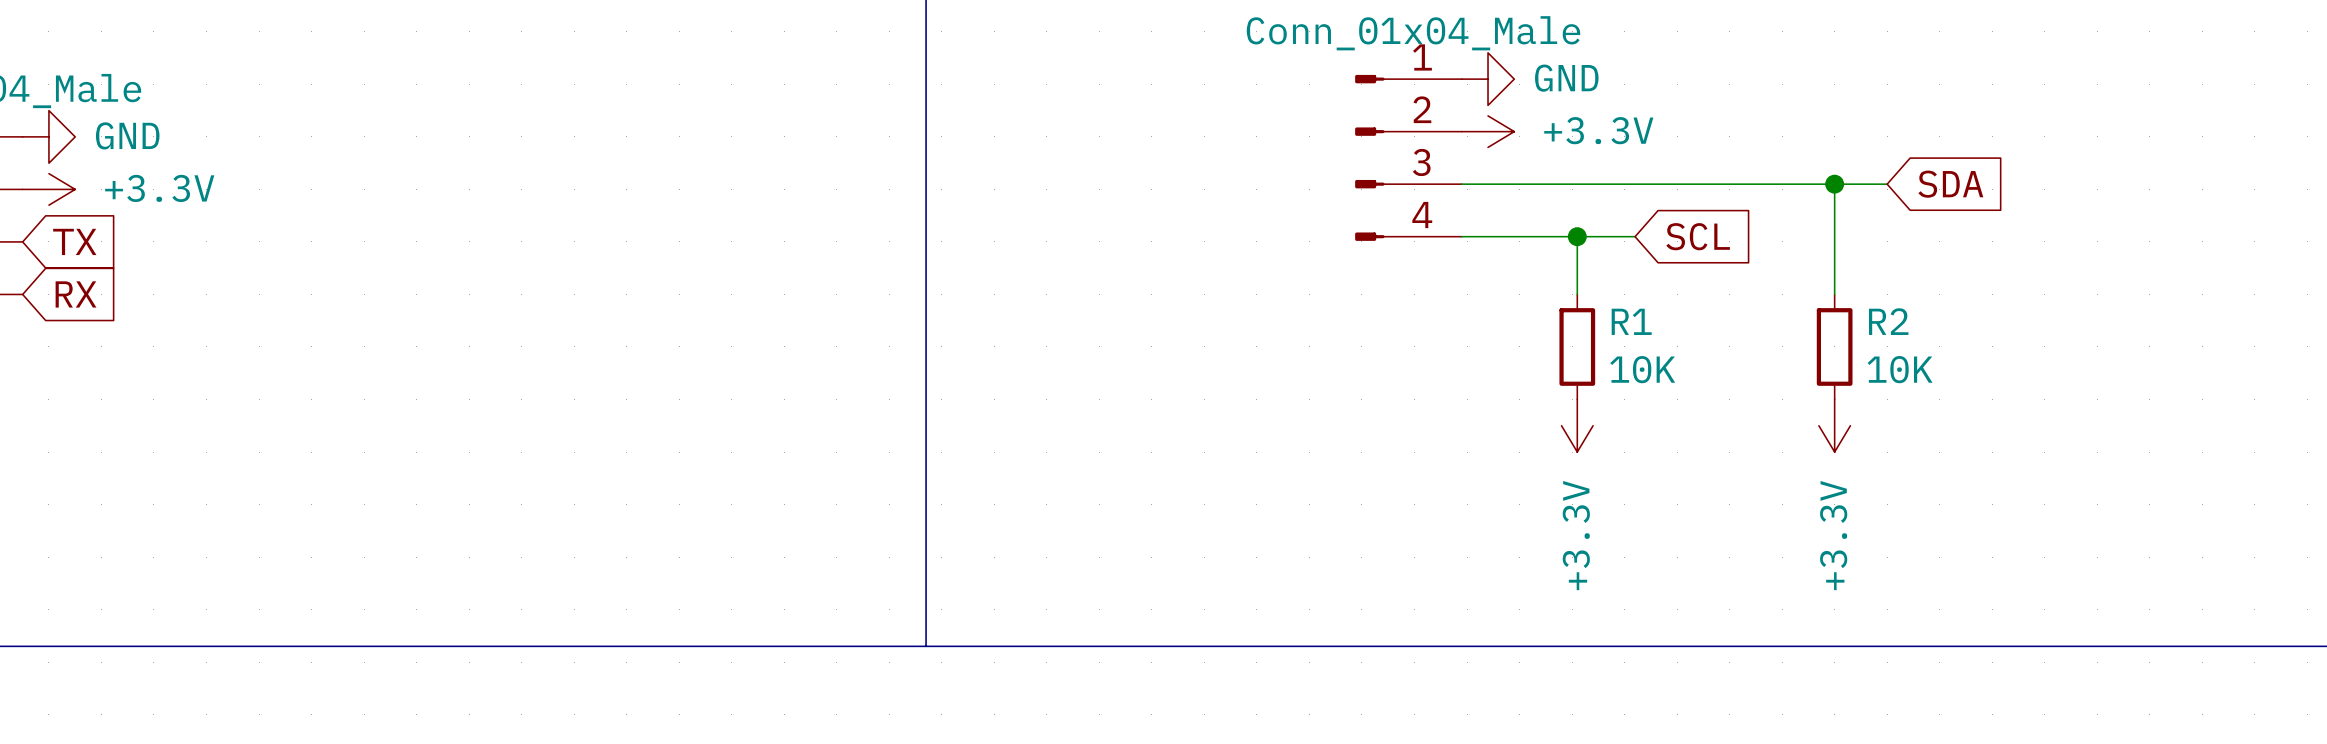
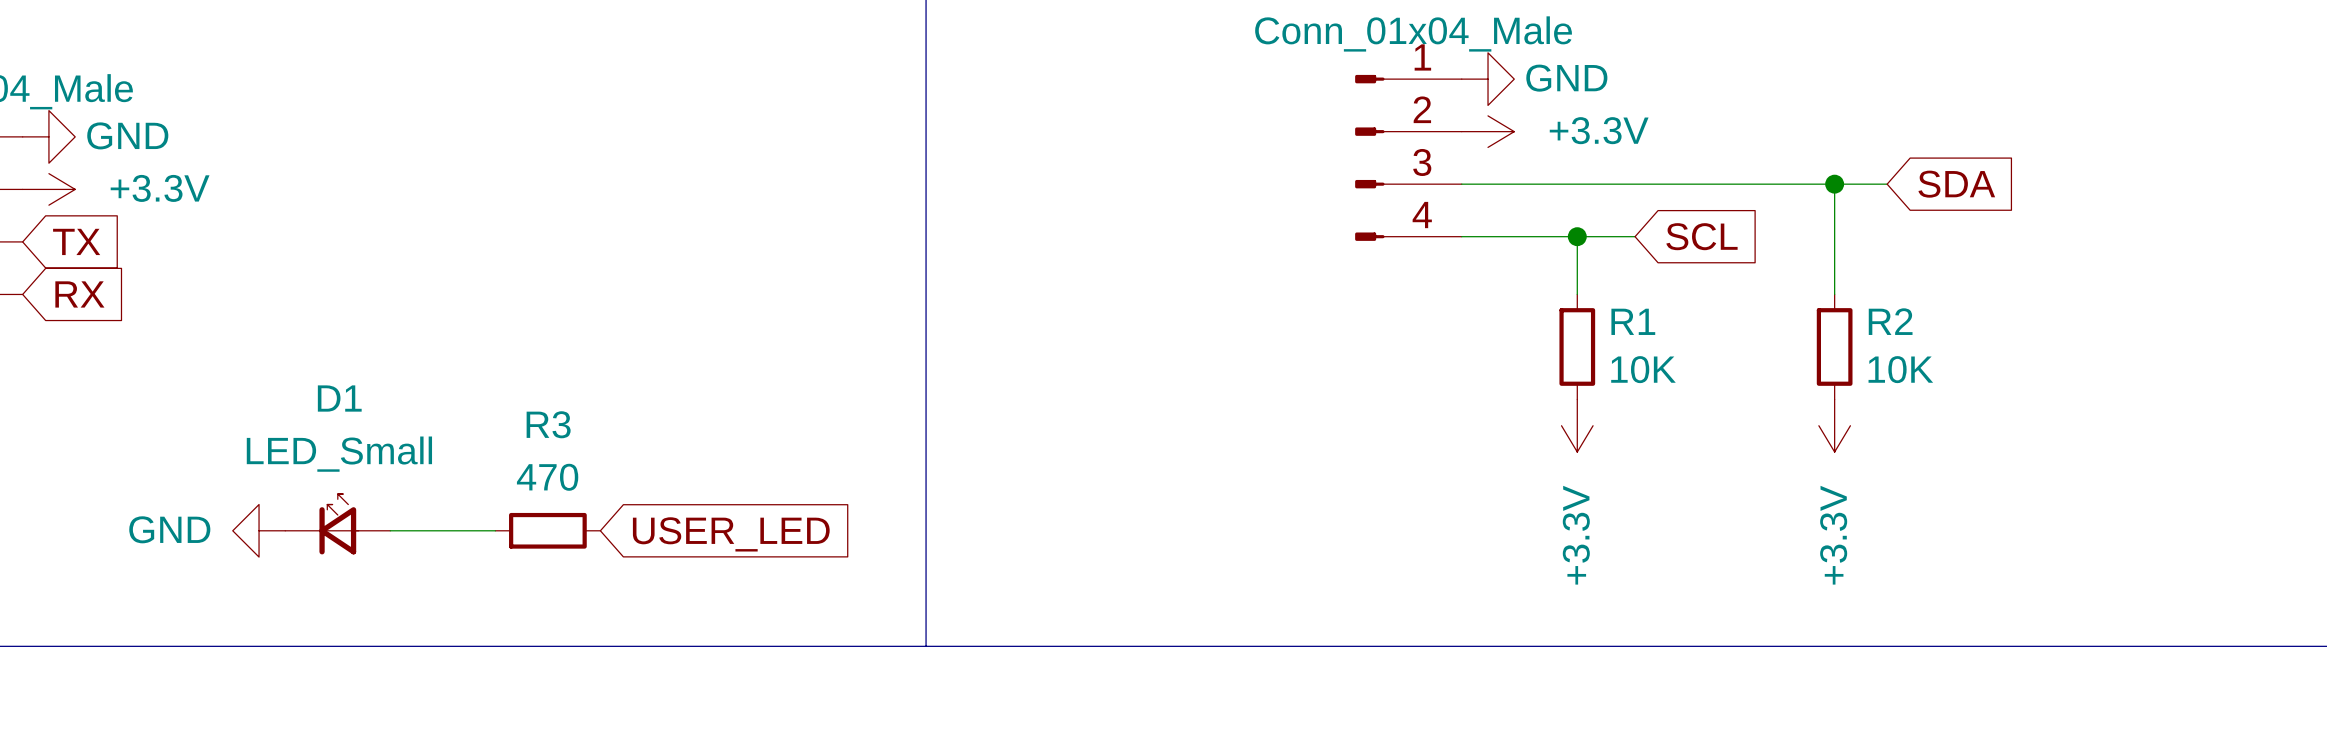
D1: none -> LED_Small (337, 524)
power symbol: none -> GND (259, 530)
wire: none -> (390, 530) (495, 530)
R3: none -> 470 (547, 530)
global label: none -> USER_LED (731, 534)

